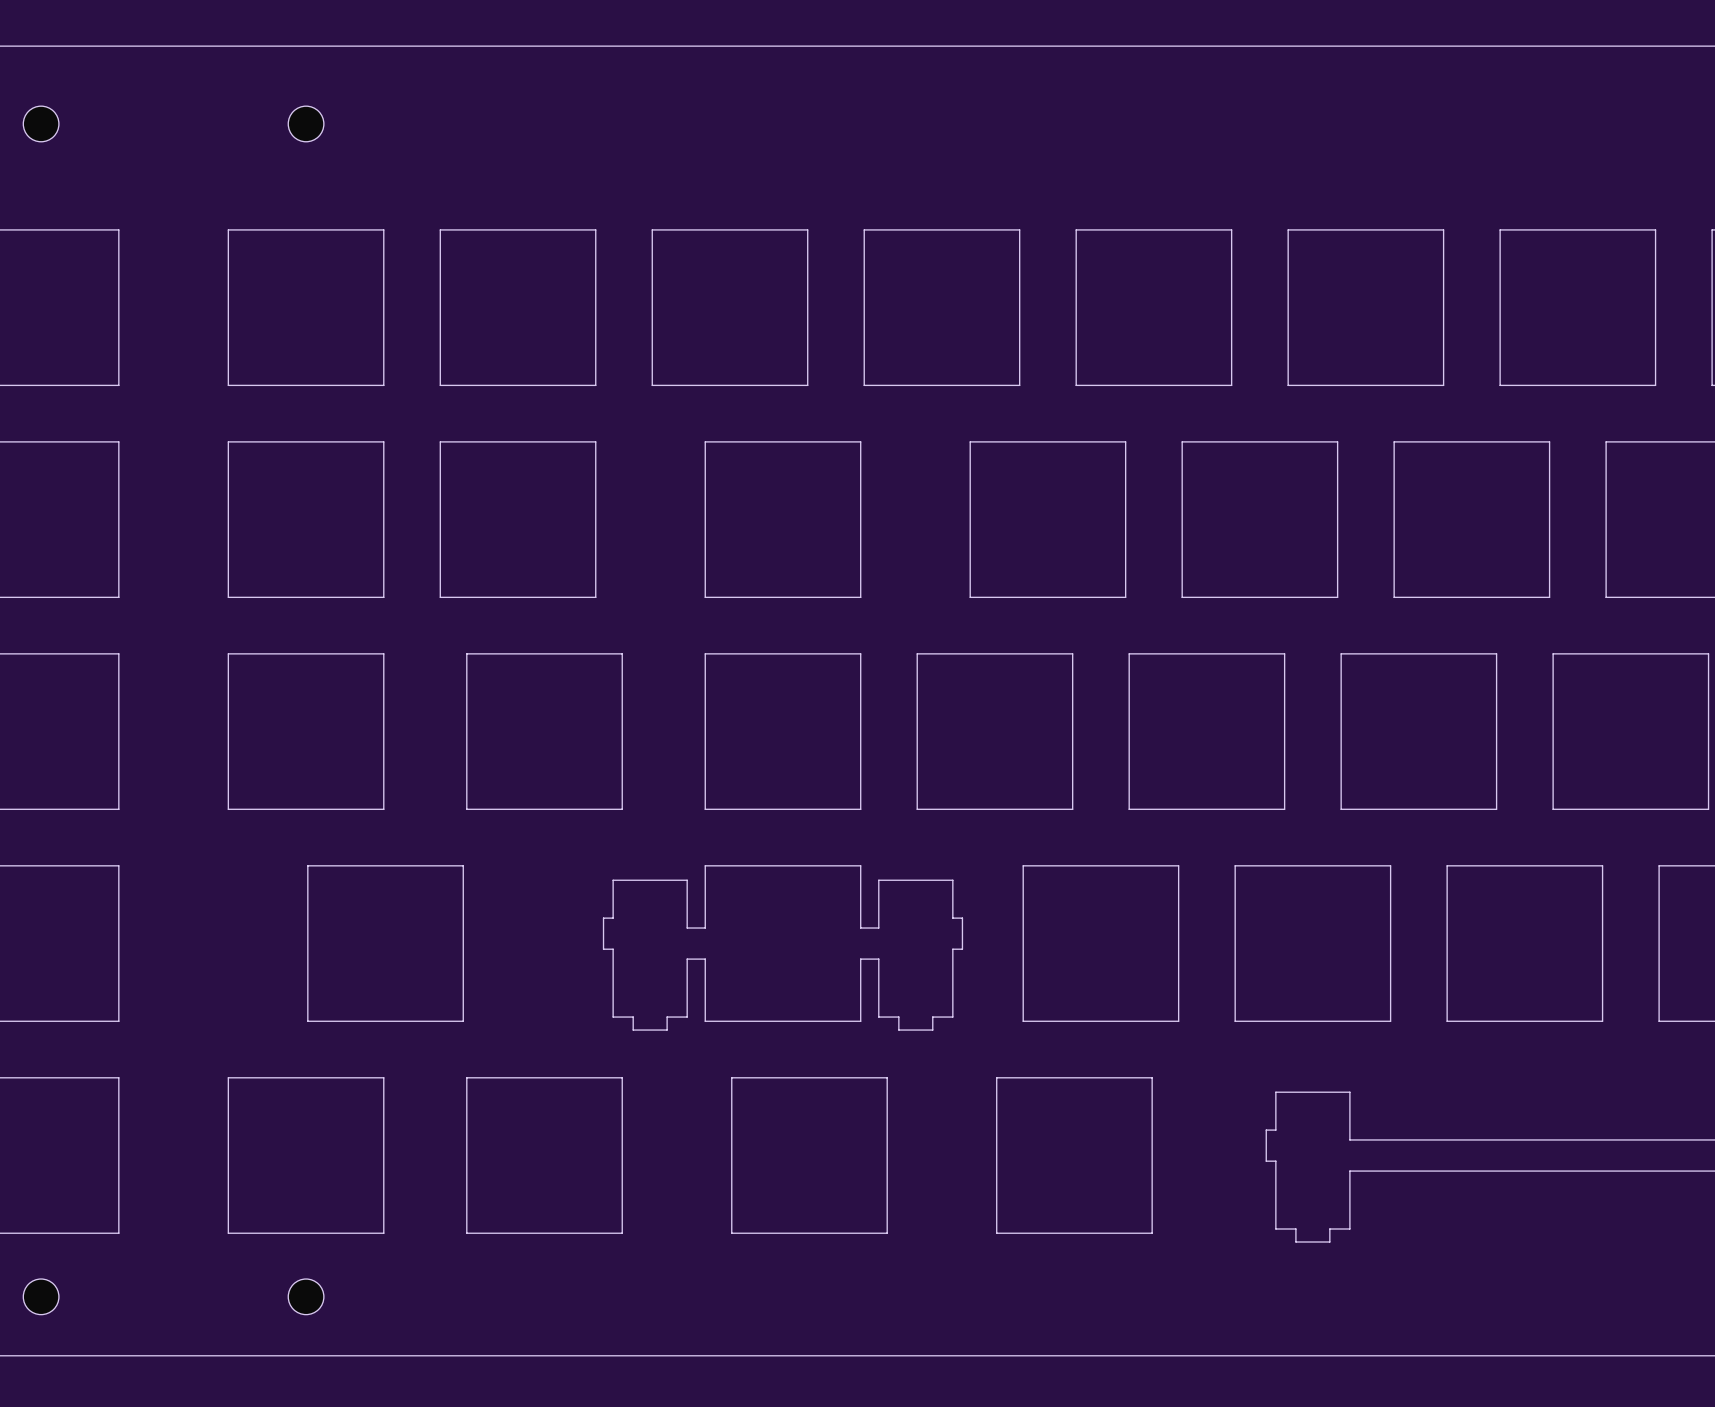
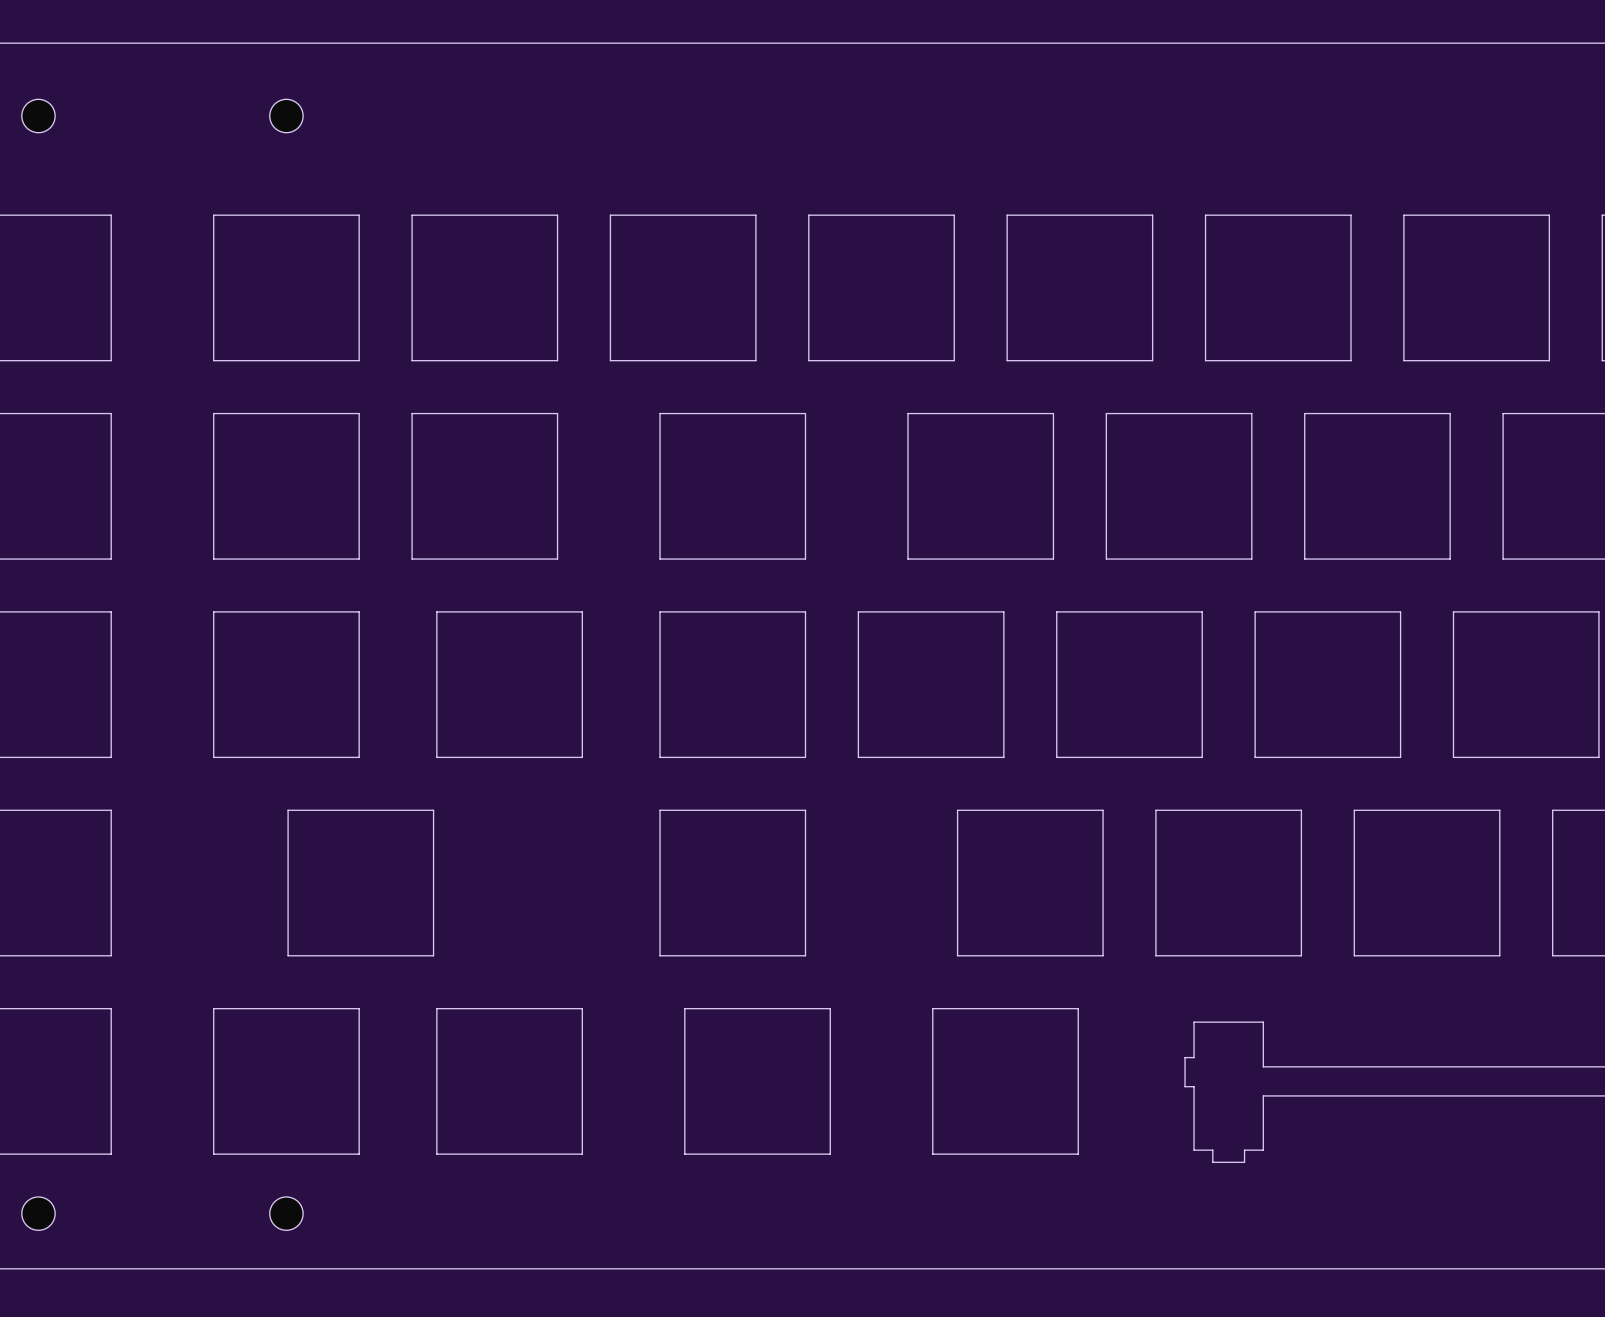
drawing shape: [602, 865, 964, 1031] -> [659, 809, 807, 957]

